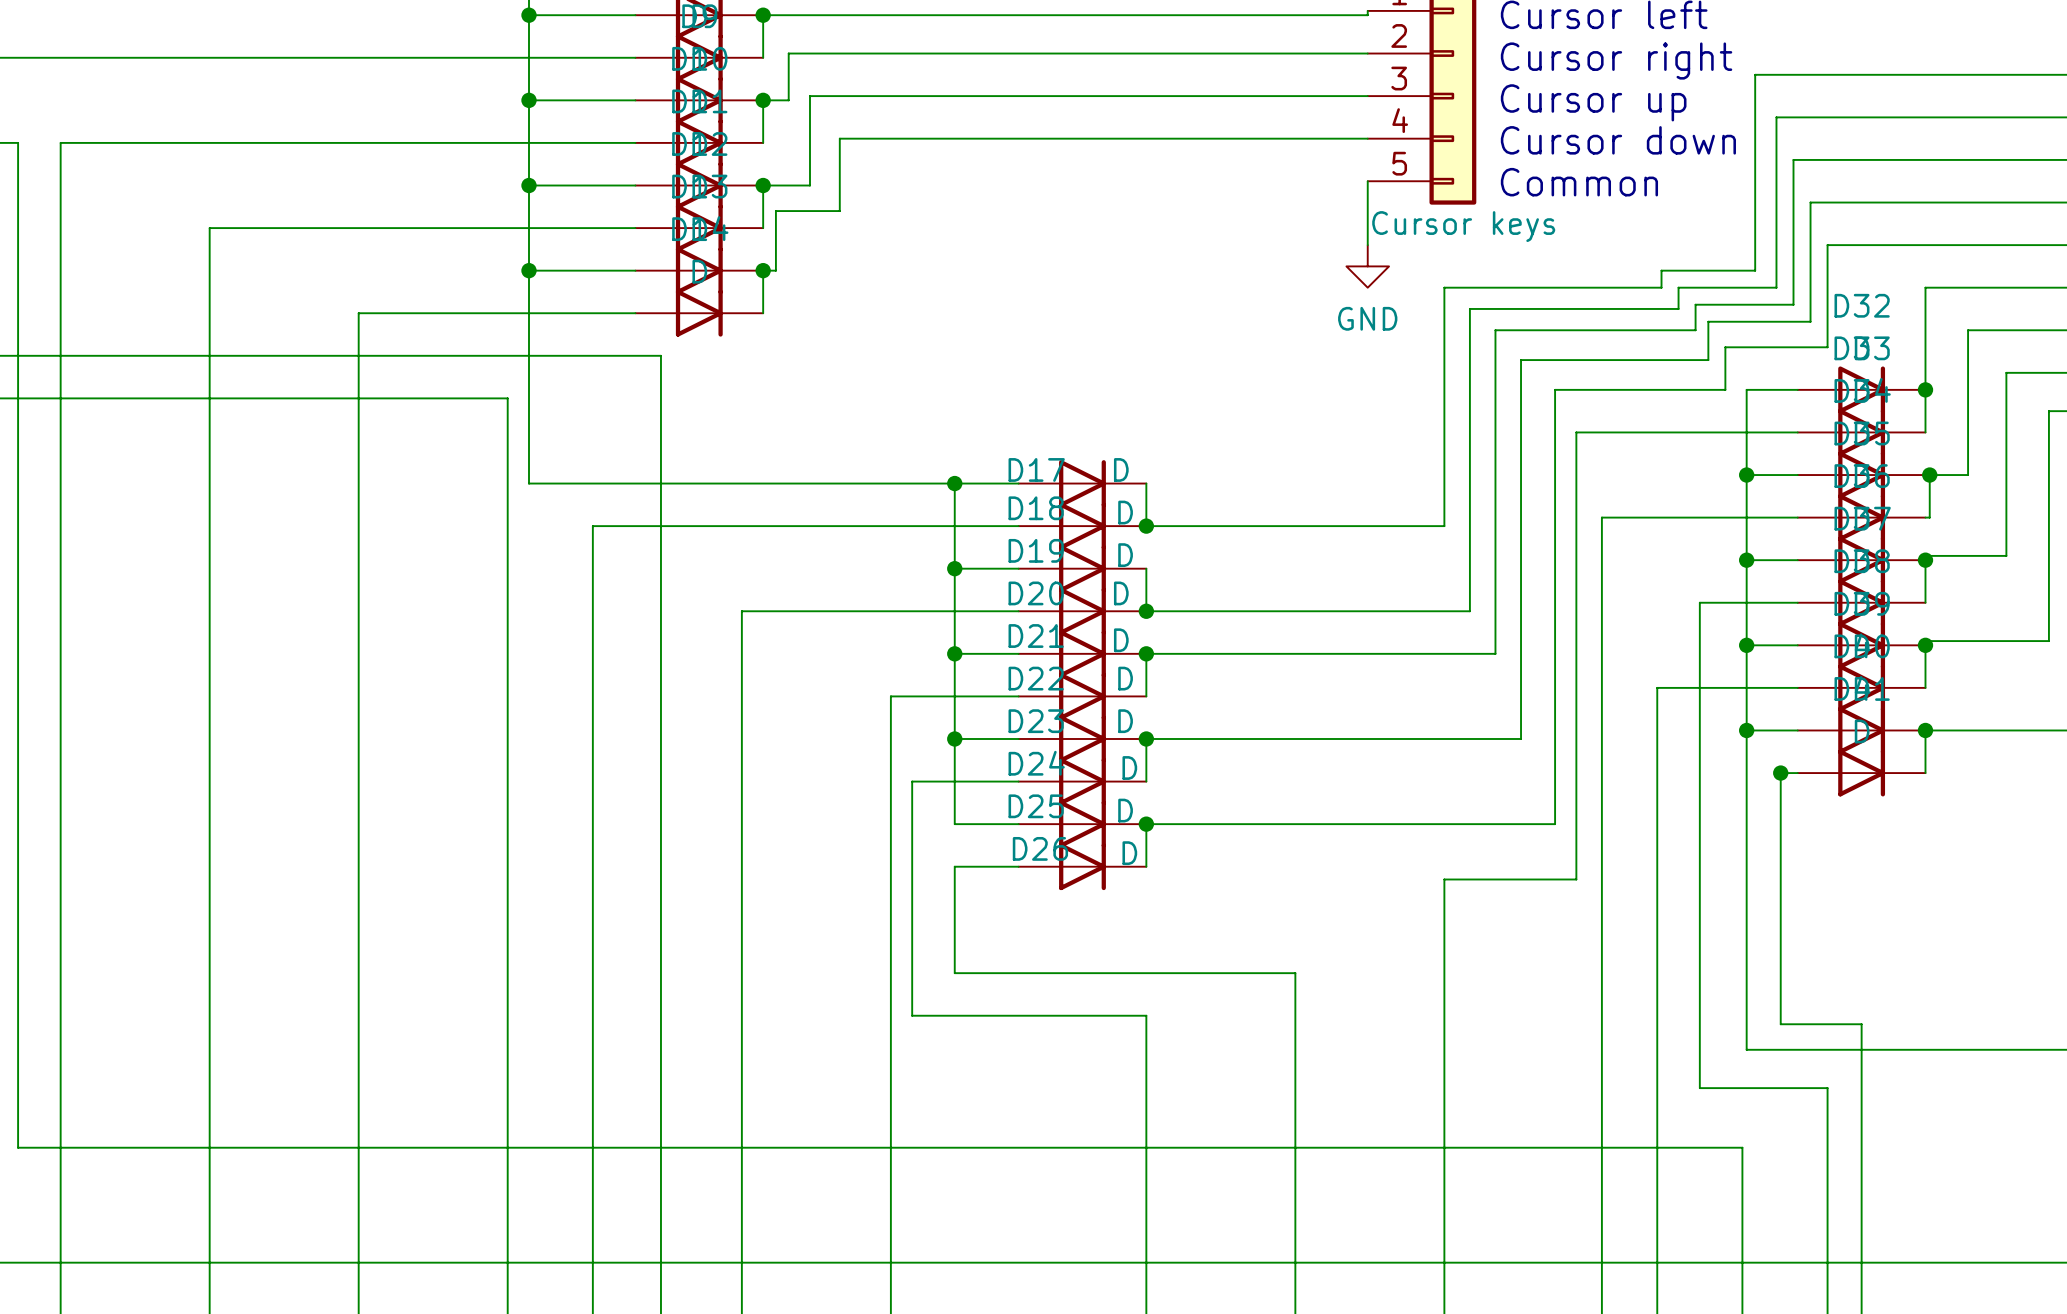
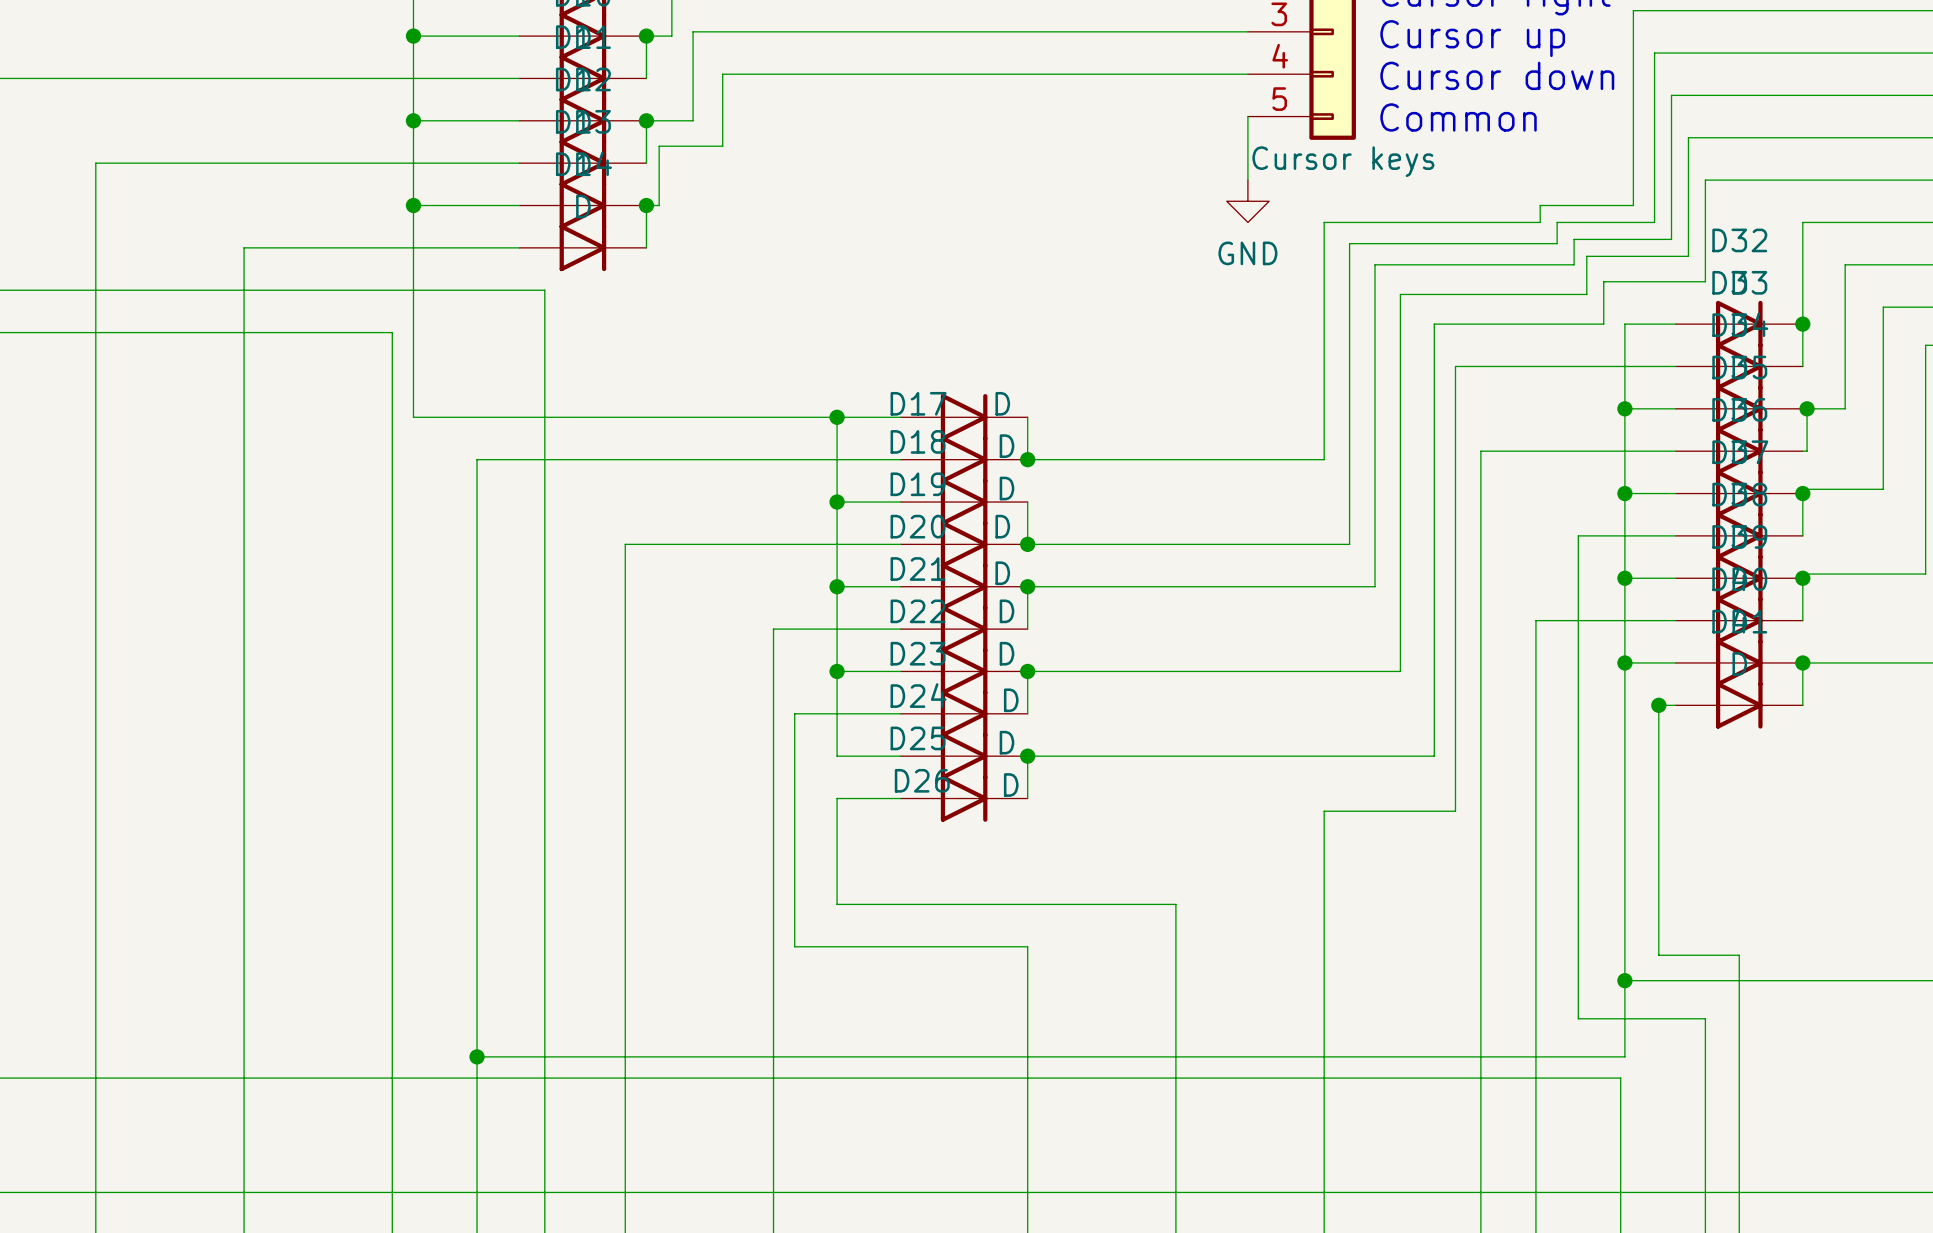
wire: none -> (1624, 980) (1624, 1056) (477, 1056)
junction: none -> (1624, 980)
junction: none -> (477, 1056)

